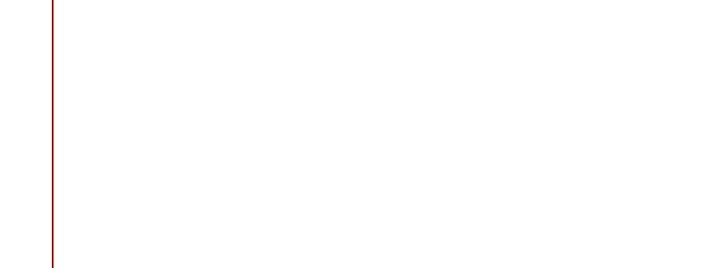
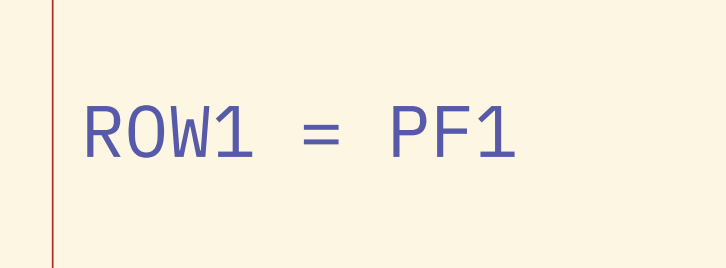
text: none -> ROW1 = PF1 (300, 131)

